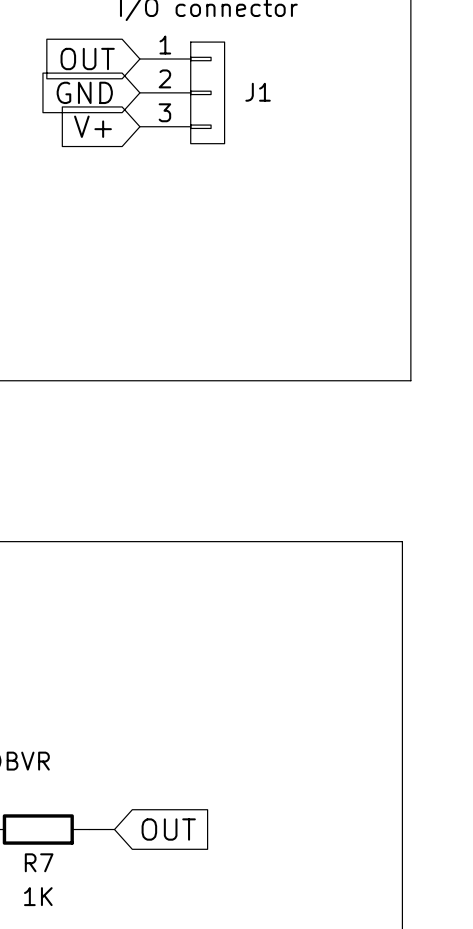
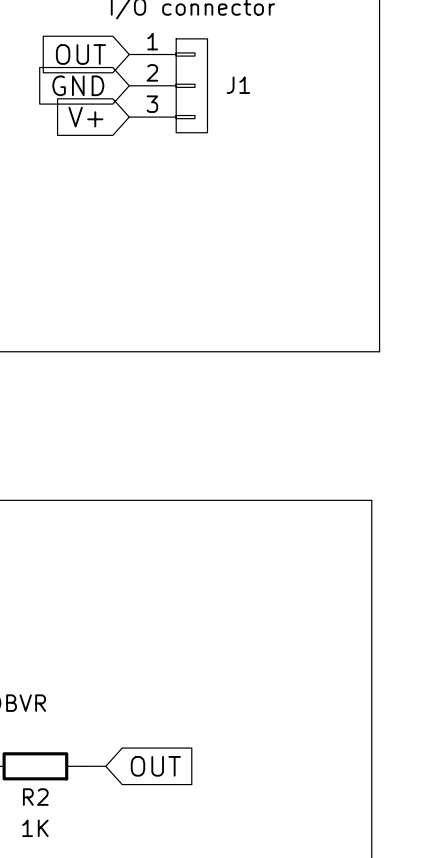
R7 name: R7 (39, 862) -> R2 (35, 797)

